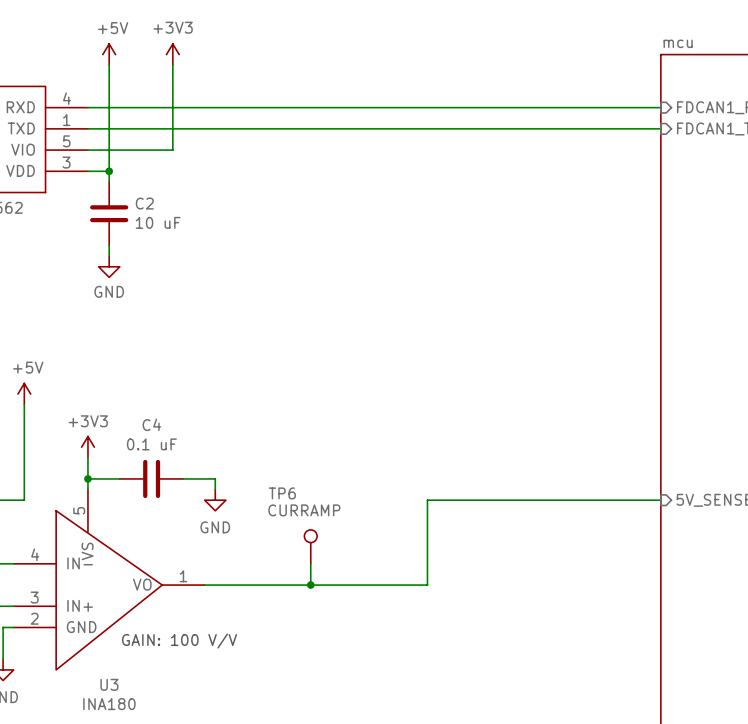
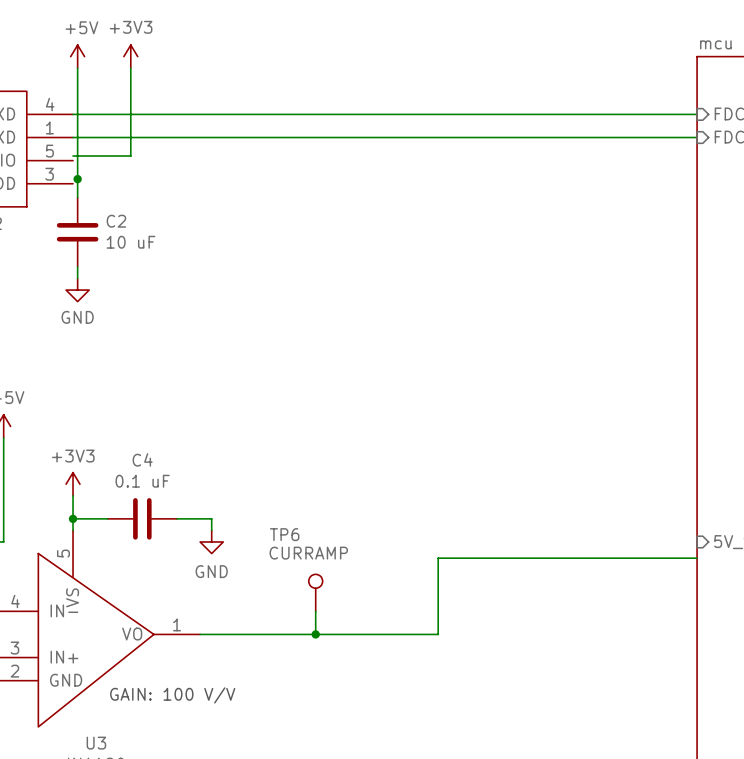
power symbol position: +5V (109, 54) -> +5V (77, 56)
power symbol position: +3V3 (172, 54) -> +3V3 (130, 56)
wire: none -> (77, 68) (77, 197)
wire: (109, 65) (109, 181) -> none
wire: none -> (130, 68) (130, 156) (73, 156)
wire: (172, 65) (172, 150) (87, 150) -> none
wire: (87, 171) (109, 171) -> none
junction position: (109, 171) -> (77, 179)
C2 position: (109, 213) -> (77, 232)
wire: (109, 245) (109, 256) -> (77, 266) (77, 278)
power symbol position: GND (109, 266) -> GND (77, 290)
wire: (660, 500) (427, 500) (427, 585) (423, 585) -> (697, 558) (438, 558) (438, 634)

